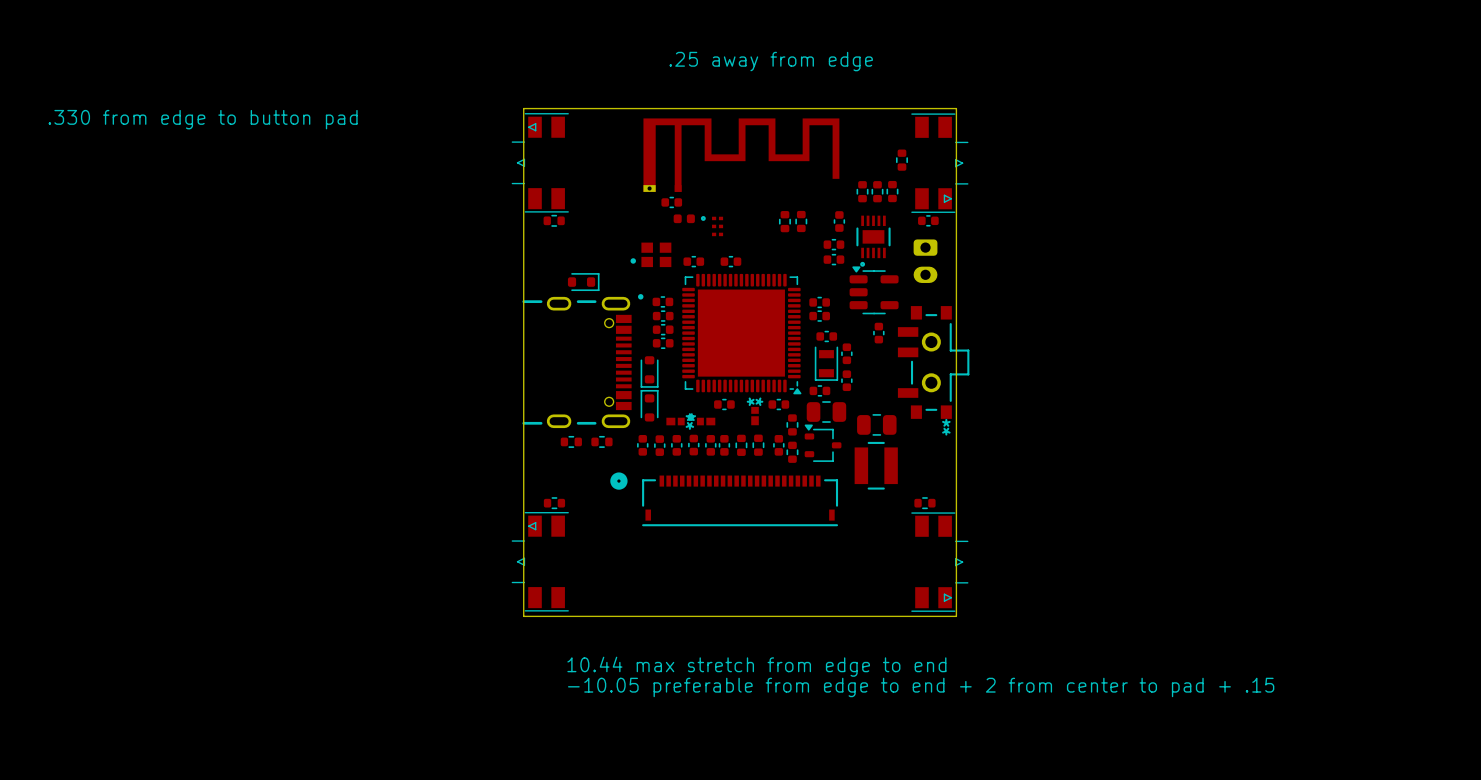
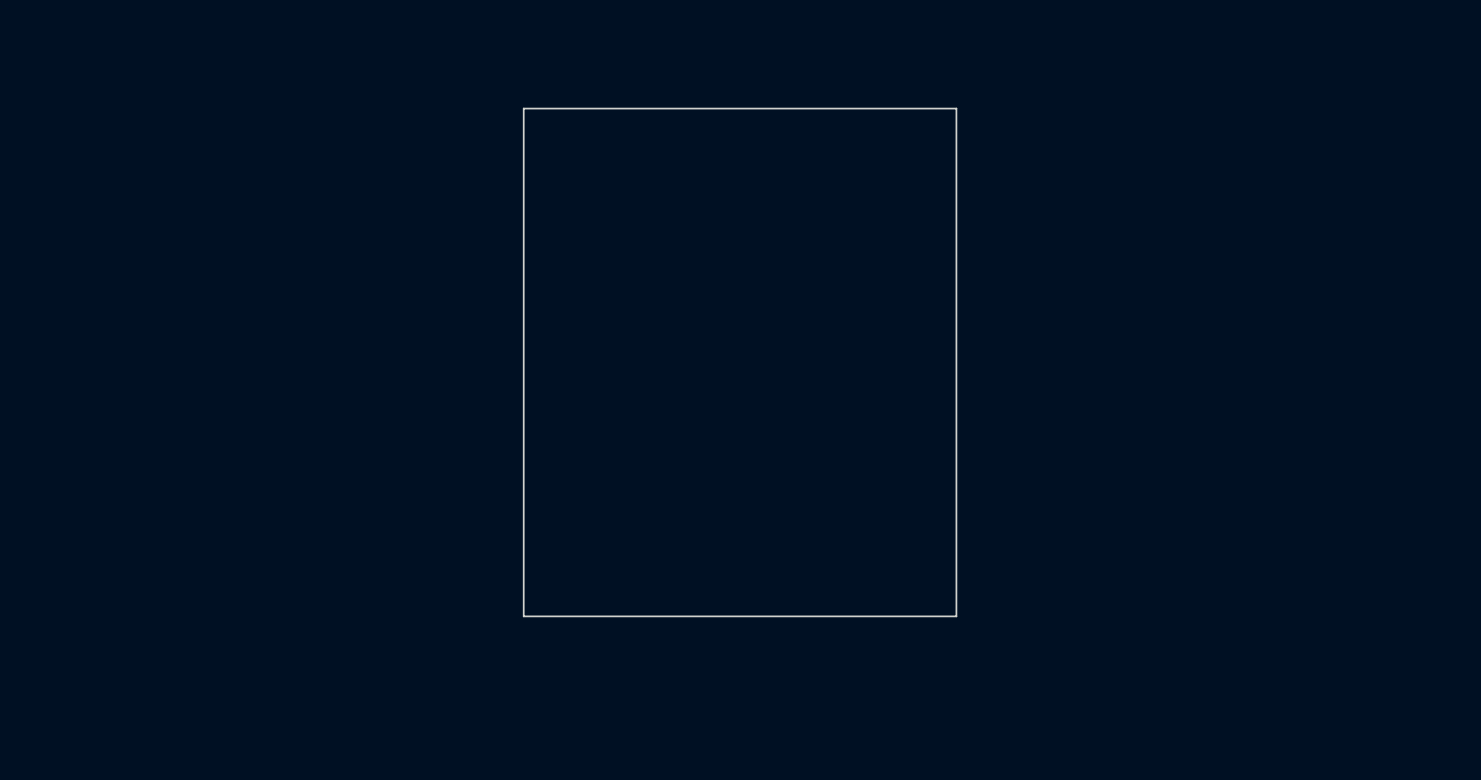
text: .25 away from edge (771, 61) -> none
text: .330 from edge to button pad (203, 119) -> none
part: (741, 155) -> none
part: (901, 160) -> none
part: (540, 162) -> none
part: (939, 163) -> none
part: (862, 191) -> none
part: (877, 191) -> none
part: (892, 191) -> none
part: (671, 202) -> none
part: (684, 218) -> none
part: (554, 220) -> none
part: (928, 220) -> none
part: (784, 221) -> none
part: (801, 221) -> none
part: (839, 221) -> none
part: (712, 226) -> none
part: (873, 241) -> none
part: (833, 244) -> none
part: (650, 254) -> none
part: (833, 259) -> none
part: (693, 261) -> none
part: (730, 261) -> none
part: (925, 261) -> none
part: (583, 282) -> none
part: (874, 290) -> none
part: (662, 301) -> none
part: (819, 302) -> none
part: (663, 316) -> none
part: (819, 316) -> none
part: (663, 329) -> none
part: (878, 333) -> none
part: (741, 334) -> none
part: (826, 336) -> none
part: (663, 343) -> none
part: (846, 353) -> none
part: (582, 361) -> none
part: (933, 362) -> none
part: (826, 363) -> none
part: (649, 372) -> none
part: (846, 380) -> none
part: (819, 390) -> none
part: (724, 404) -> none
part: (778, 404) -> none
part: (649, 405) -> none
part: (826, 412) -> none
part: (755, 416) -> none
part: (675, 421) -> none
part: (706, 421) -> none
part: (792, 424) -> none
part: (876, 424) -> none
part: (571, 441) -> none
part: (601, 441) -> none
part: (823, 443) -> none
part: (642, 445) -> none
part: (659, 445) -> none
part: (676, 445) -> none
part: (693, 445) -> none
part: (710, 445) -> none
part: (724, 445) -> none
part: (741, 445) -> none
part: (758, 445) -> none
part: (778, 445) -> none
part: (792, 452) -> none
part: (876, 465) -> none
part: (724, 499) -> none
part: (554, 503) -> none
part: (924, 503) -> none
part: (540, 561) -> none
part: (939, 562) -> none
text: 10.44 max stretch from edge to end (756, 666) -> none
text: -10.05 preferable from edge to end + 2 from center to pad + .15 (921, 687) -> none

